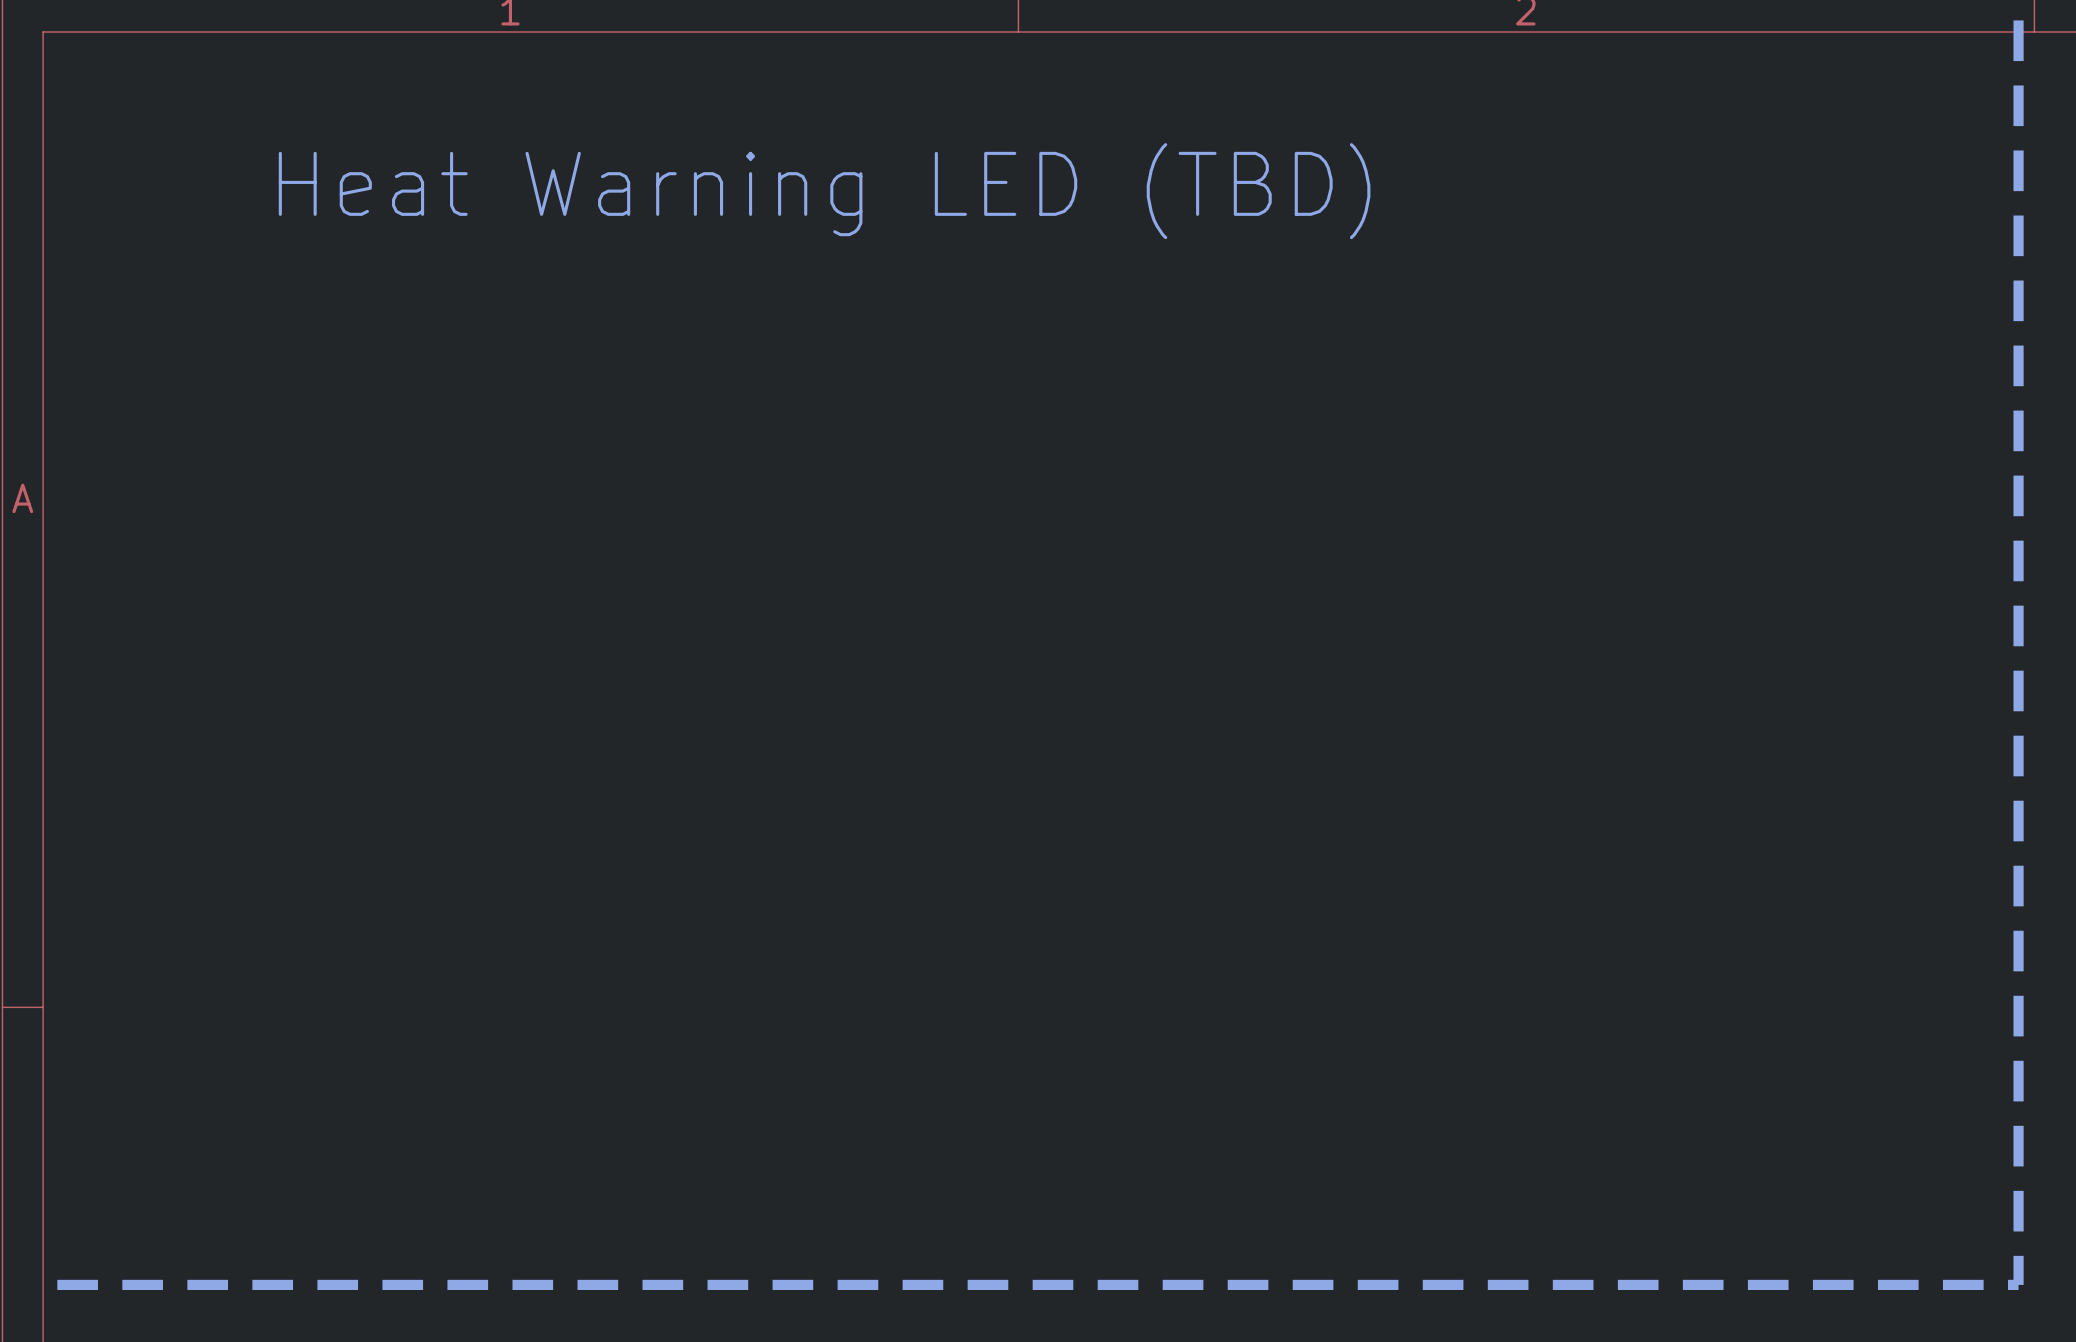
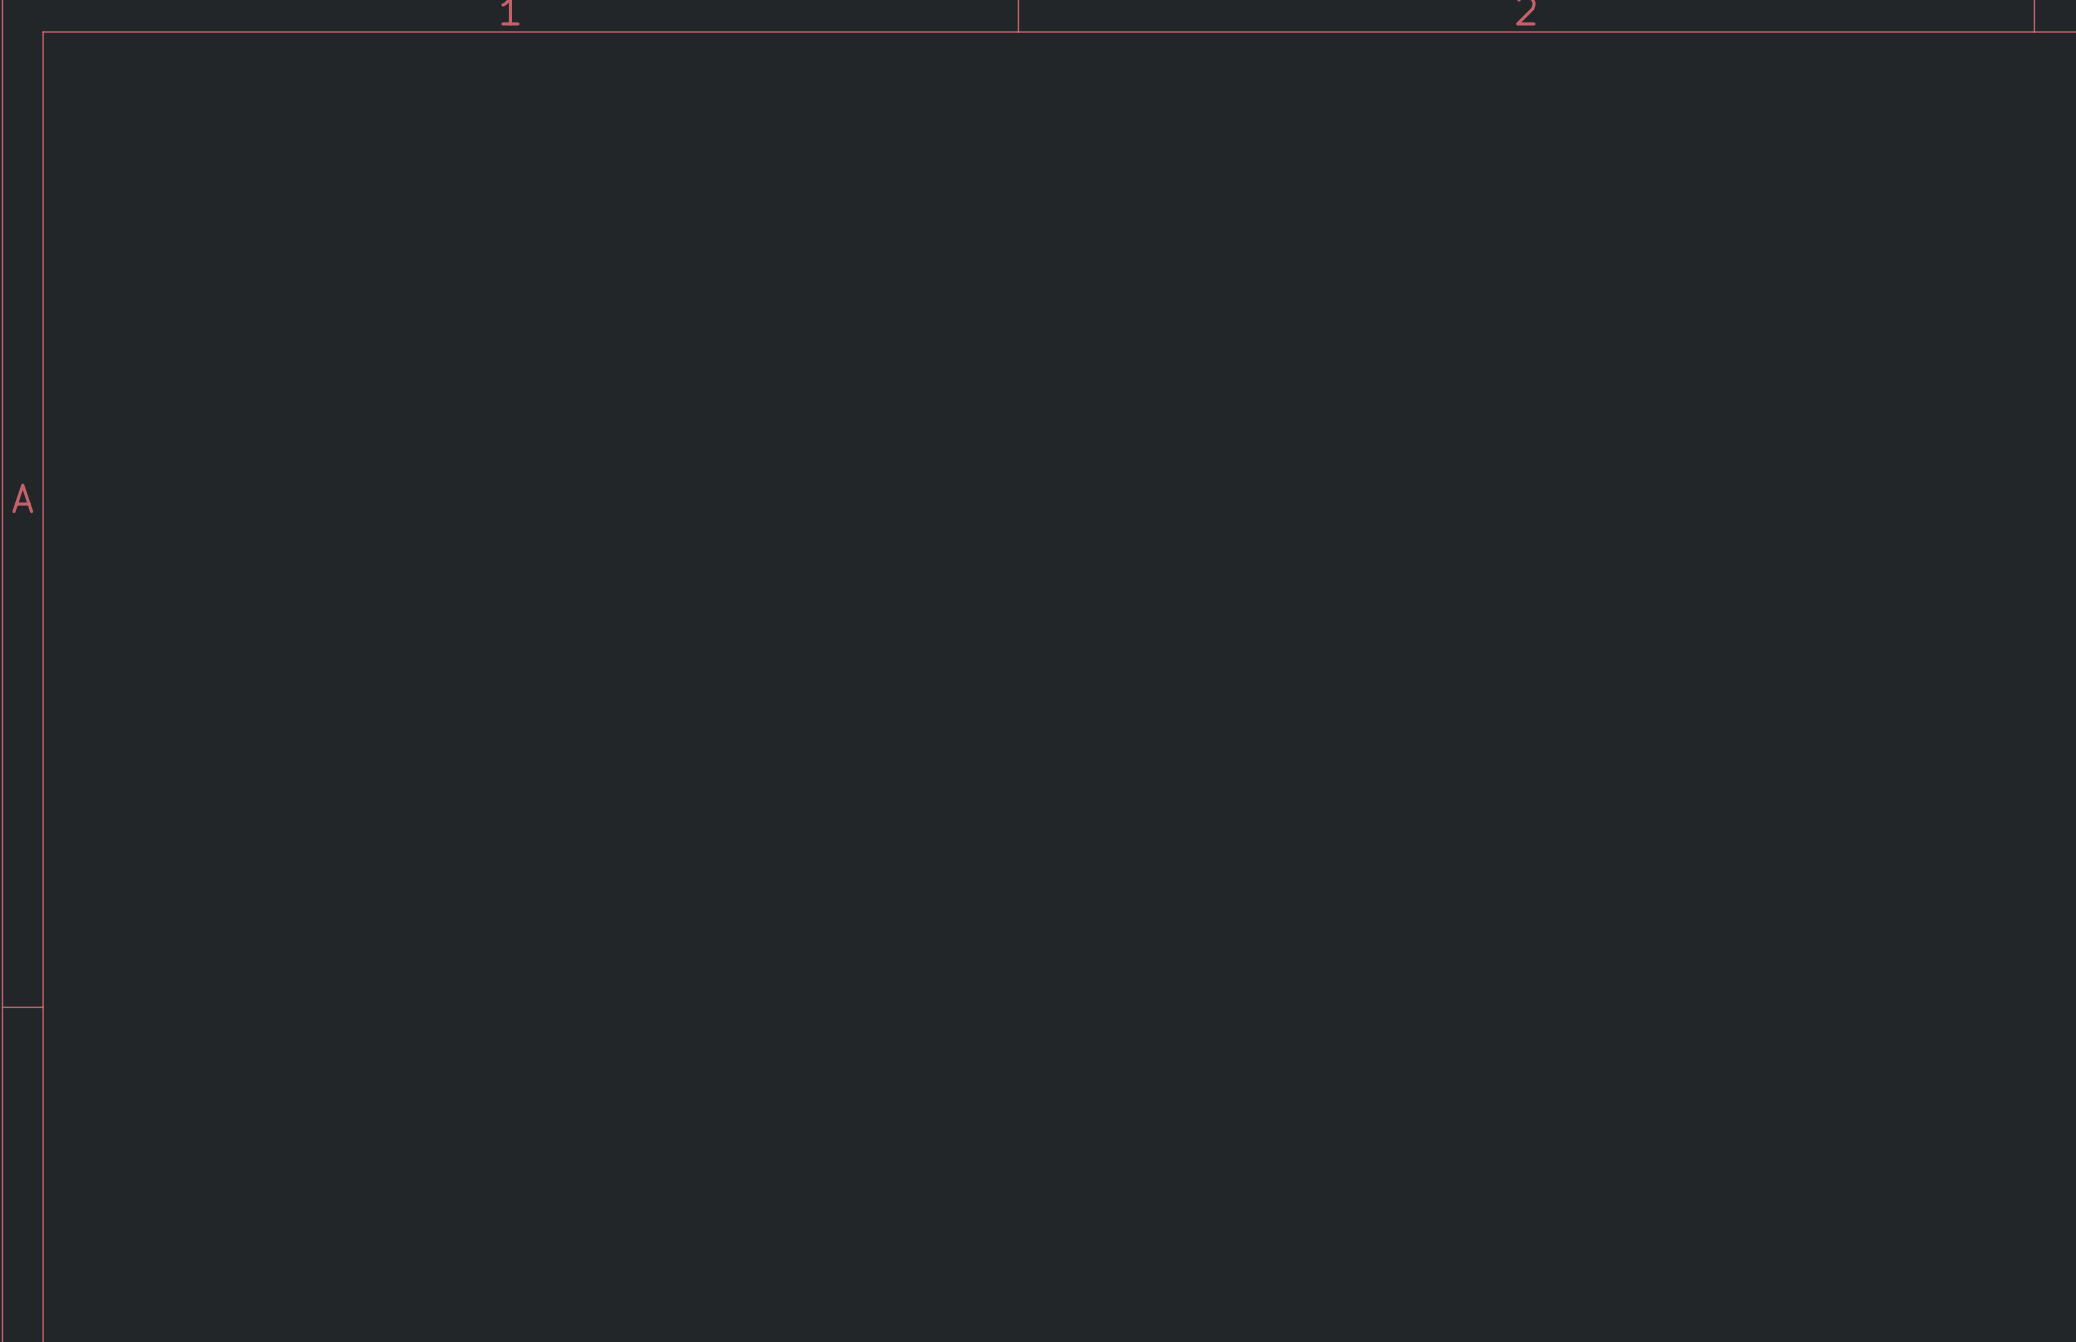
line: (2018, 20) (2018, 1284) (57, 1284) -> none
text: Heat Warning LED (TBD) (824, 191) -> none

